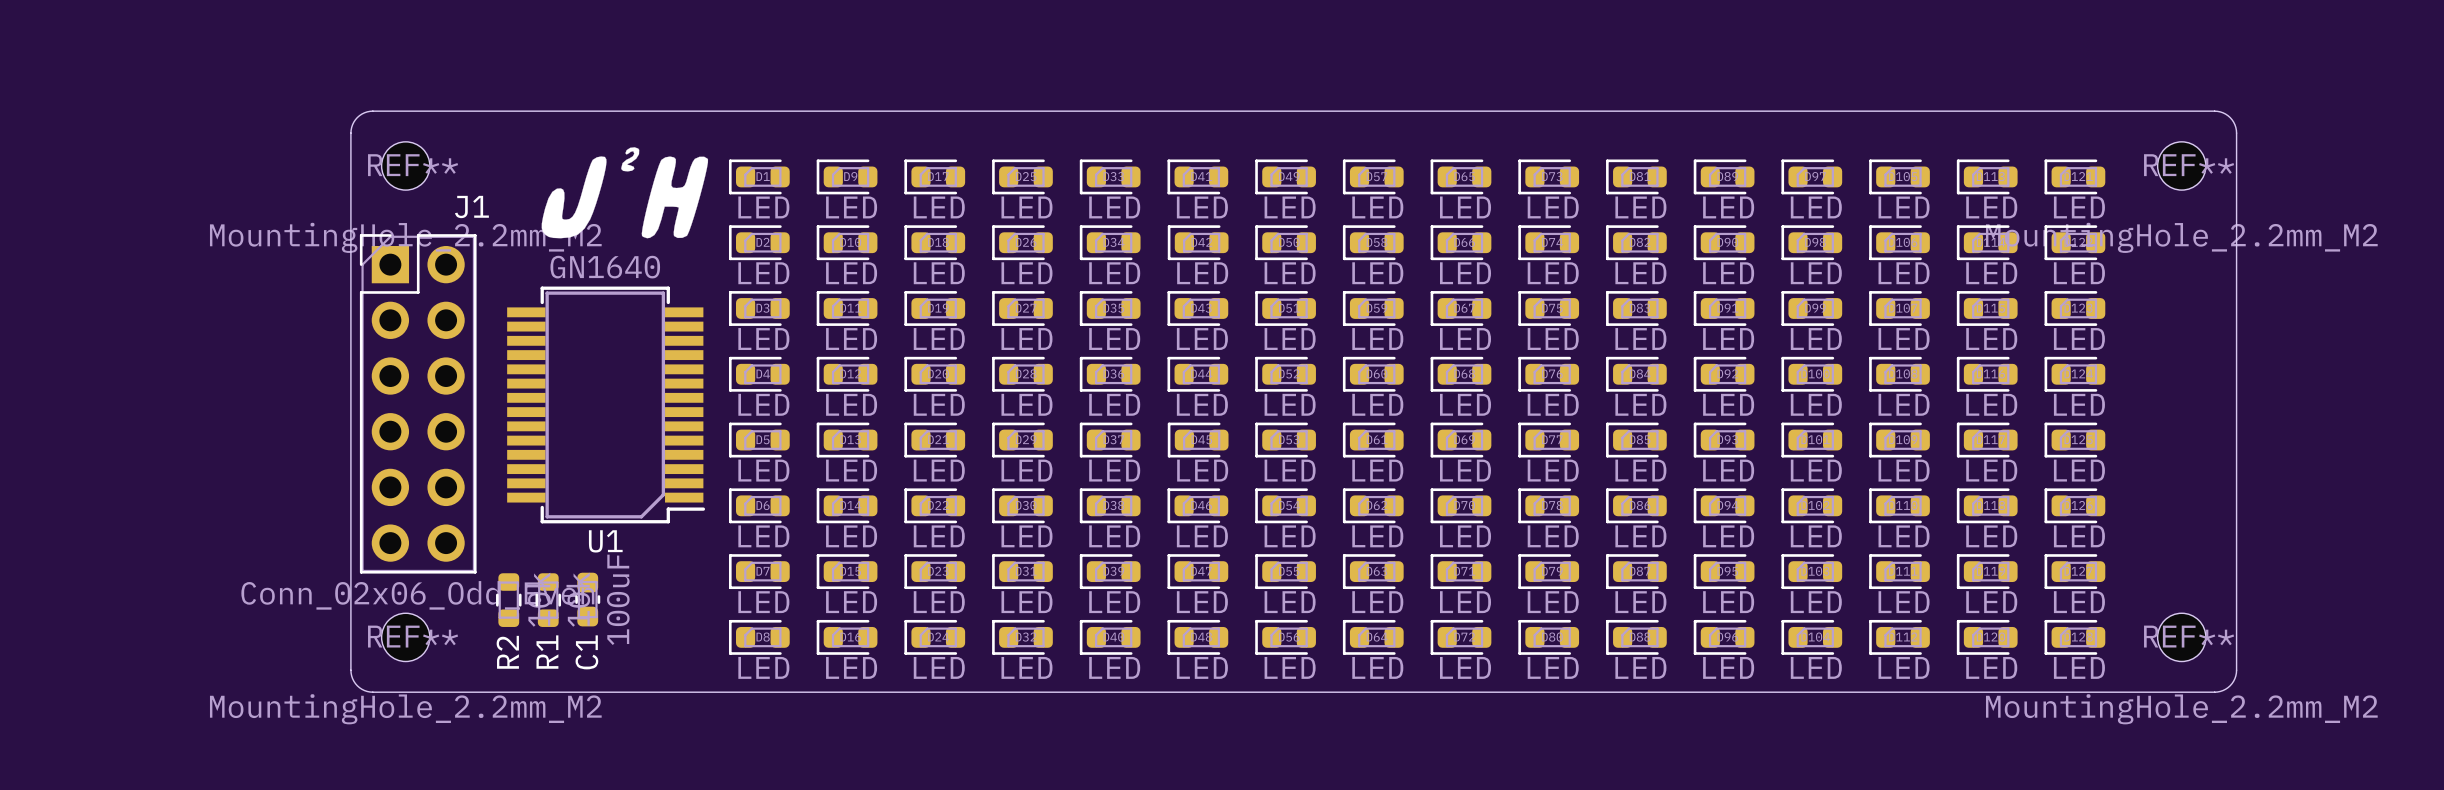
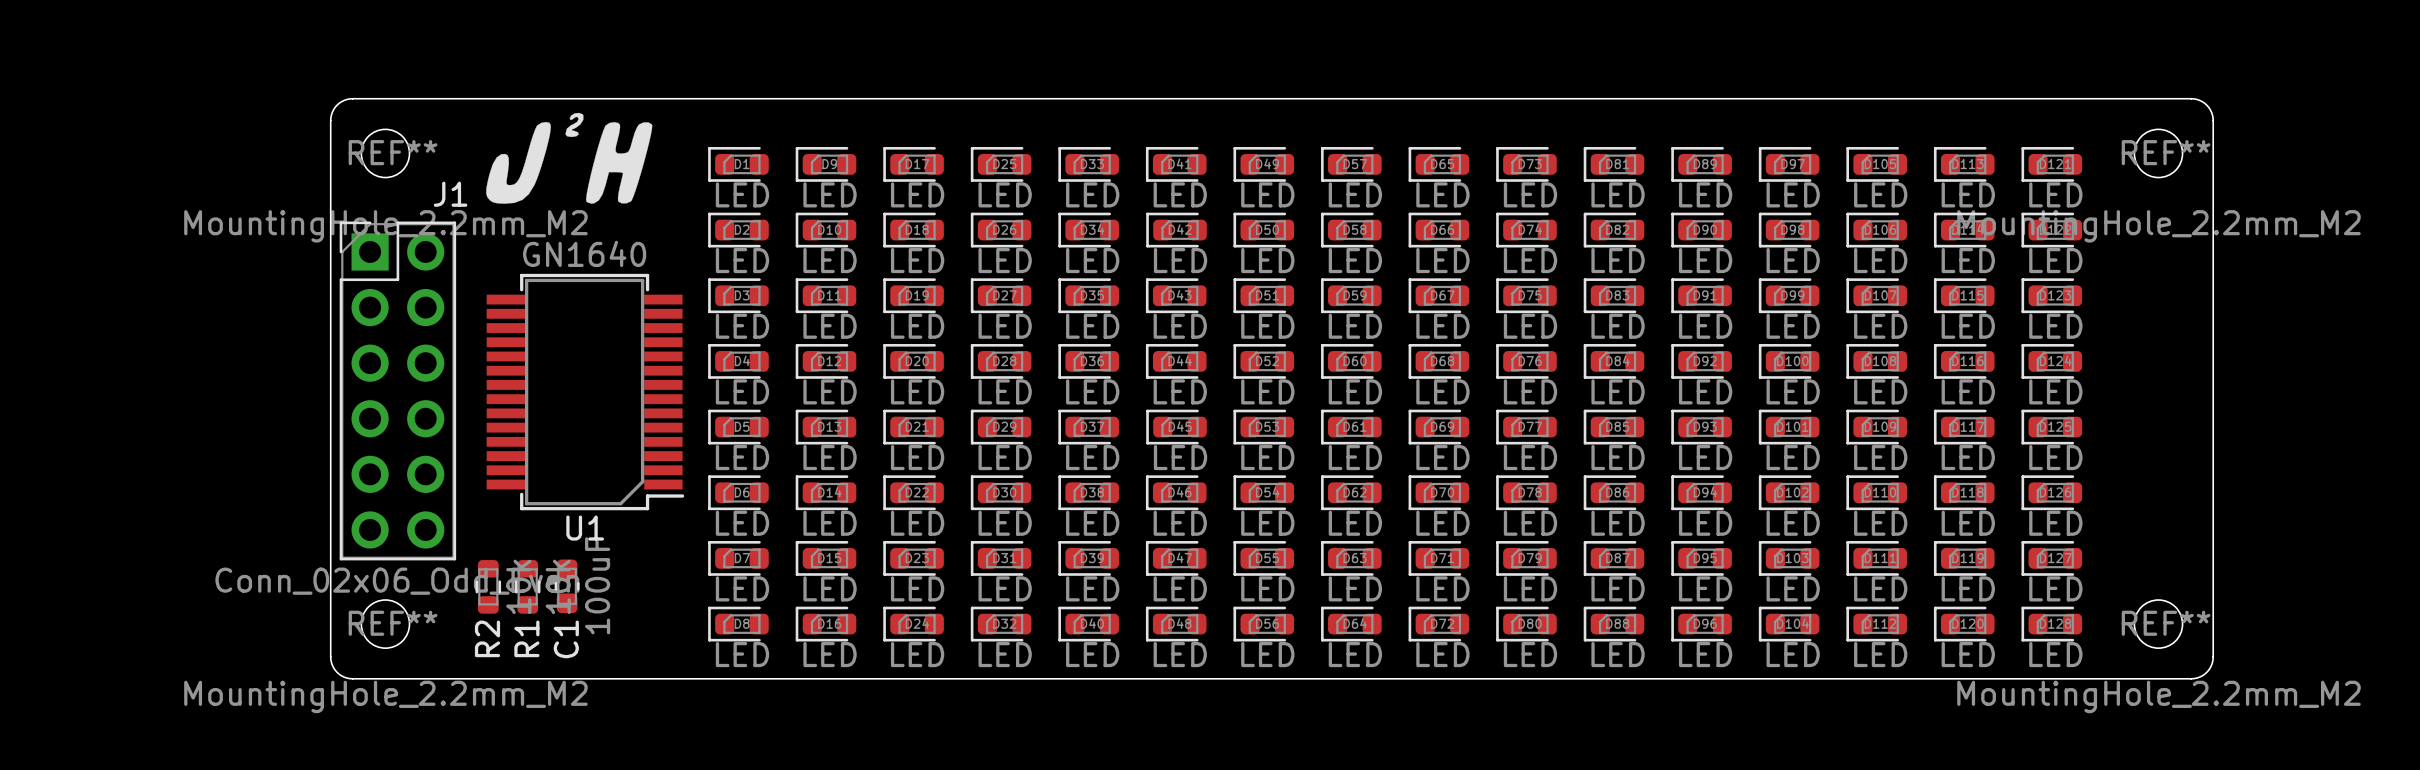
drawing position: (624, 192) -> (569, 158)

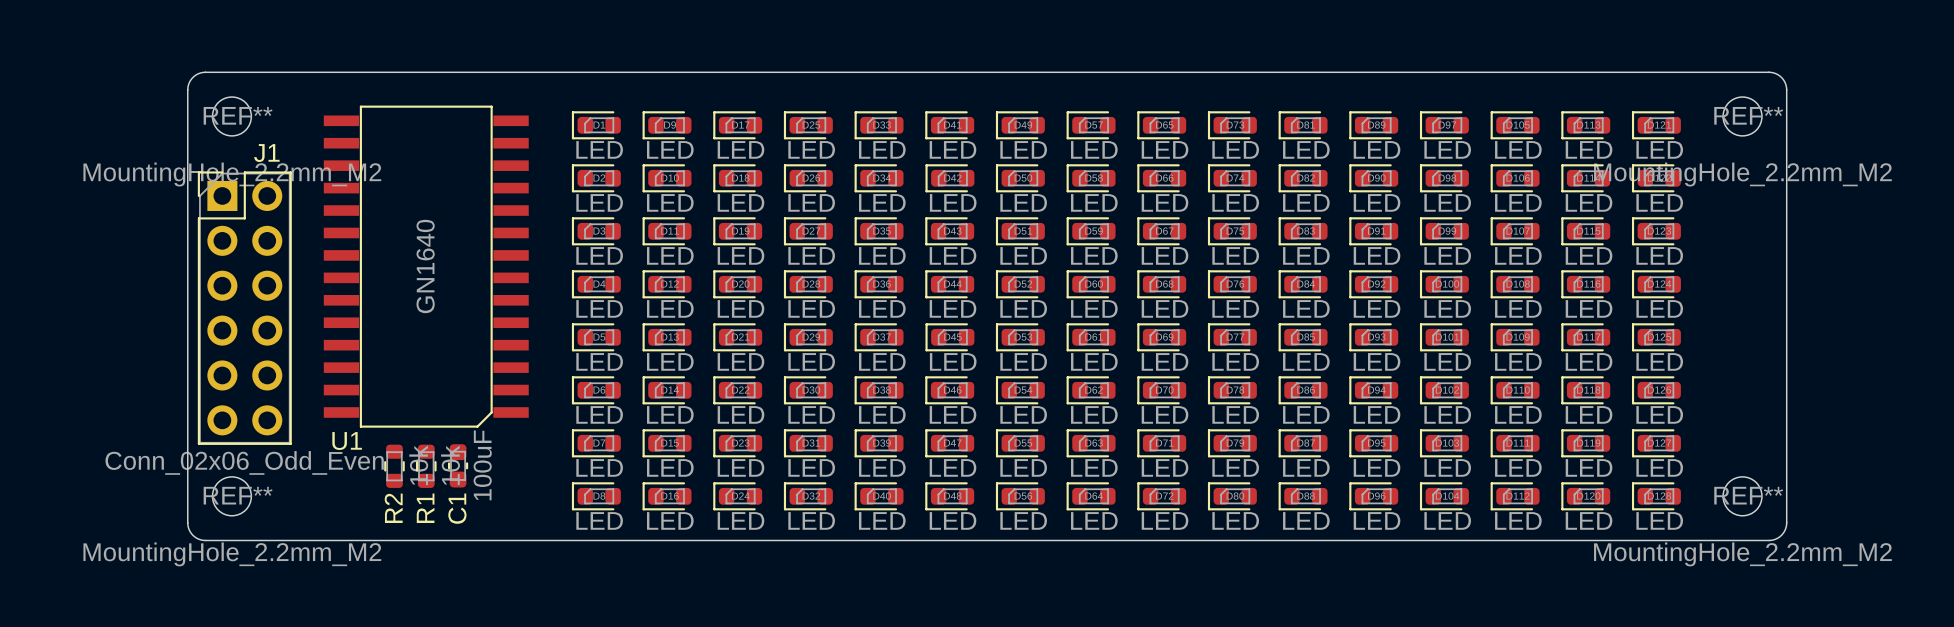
board edge: (352, 98) (344, 100) (337, 105) (332, 112) (330, 120) (330, 656) (332, 665) (337, 672) (344, 677) (352, 678) -> (284, 72) (203, 72) (192, 77) (187, 89) (188, 527) (192, 535) (203, 540) (284, 540)
drawing: [486, 112, 653, 204] -> none
REF** position: (385, 153) -> (231, 116)
J1 name position: J1 (450, 194) -> J1 (266, 153)
U1 value position: GN1640 (584, 253) -> GN1640 (425, 266)
U1 footprint: [486, 273, 685, 511] -> [323, 105, 529, 428]
J1 position: (397, 390) -> (244, 308)
U1 name position: U1 (585, 528) -> U1 (347, 441)
REF** position: (385, 624) -> (231, 496)

